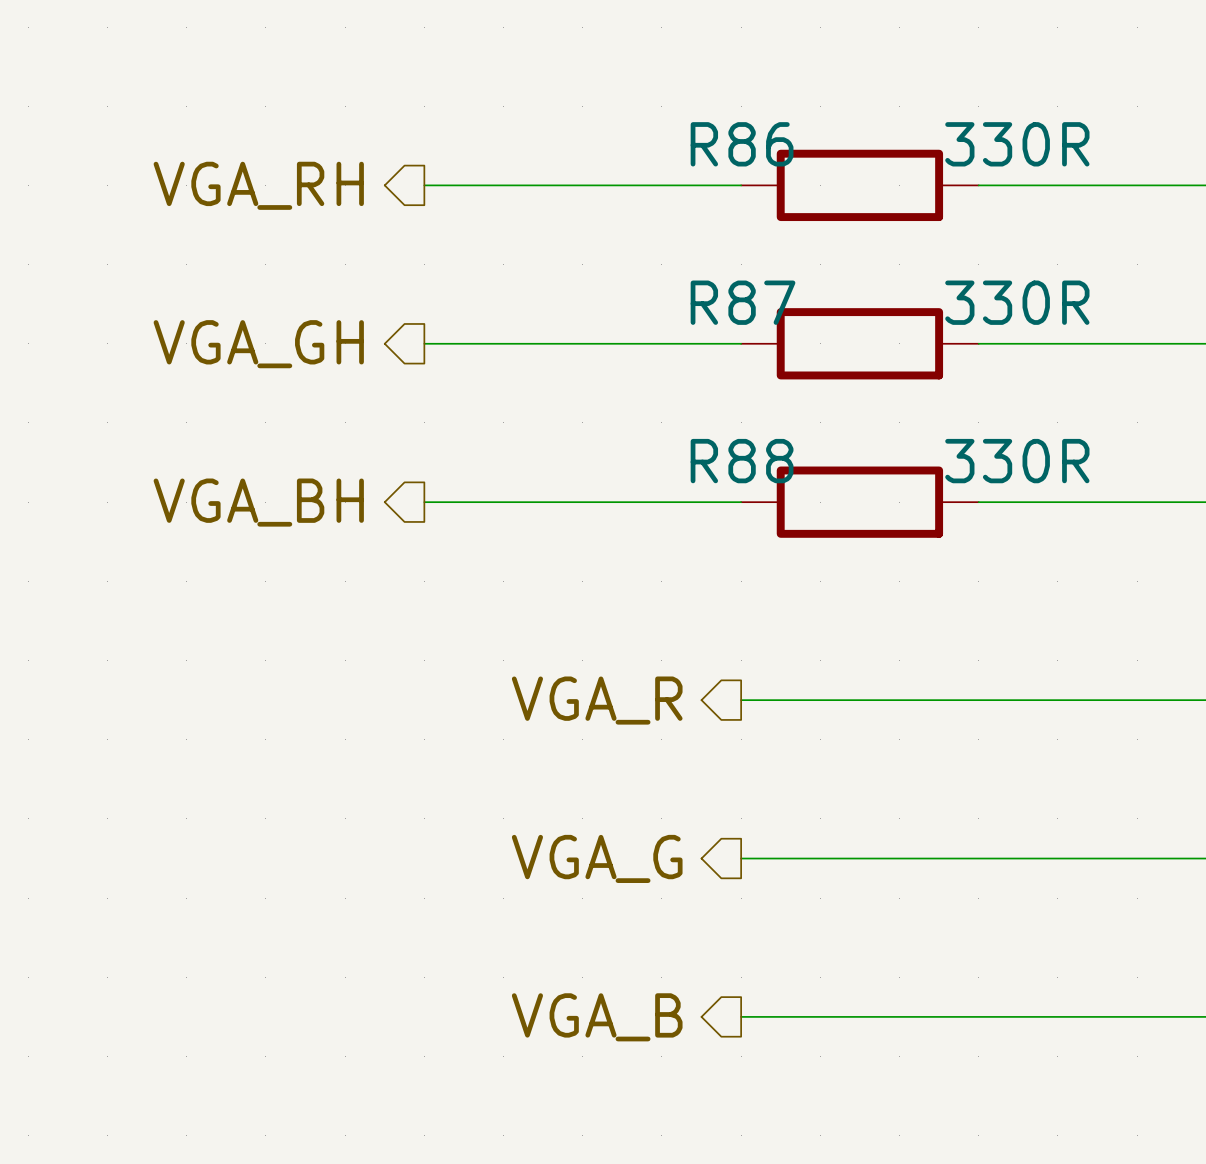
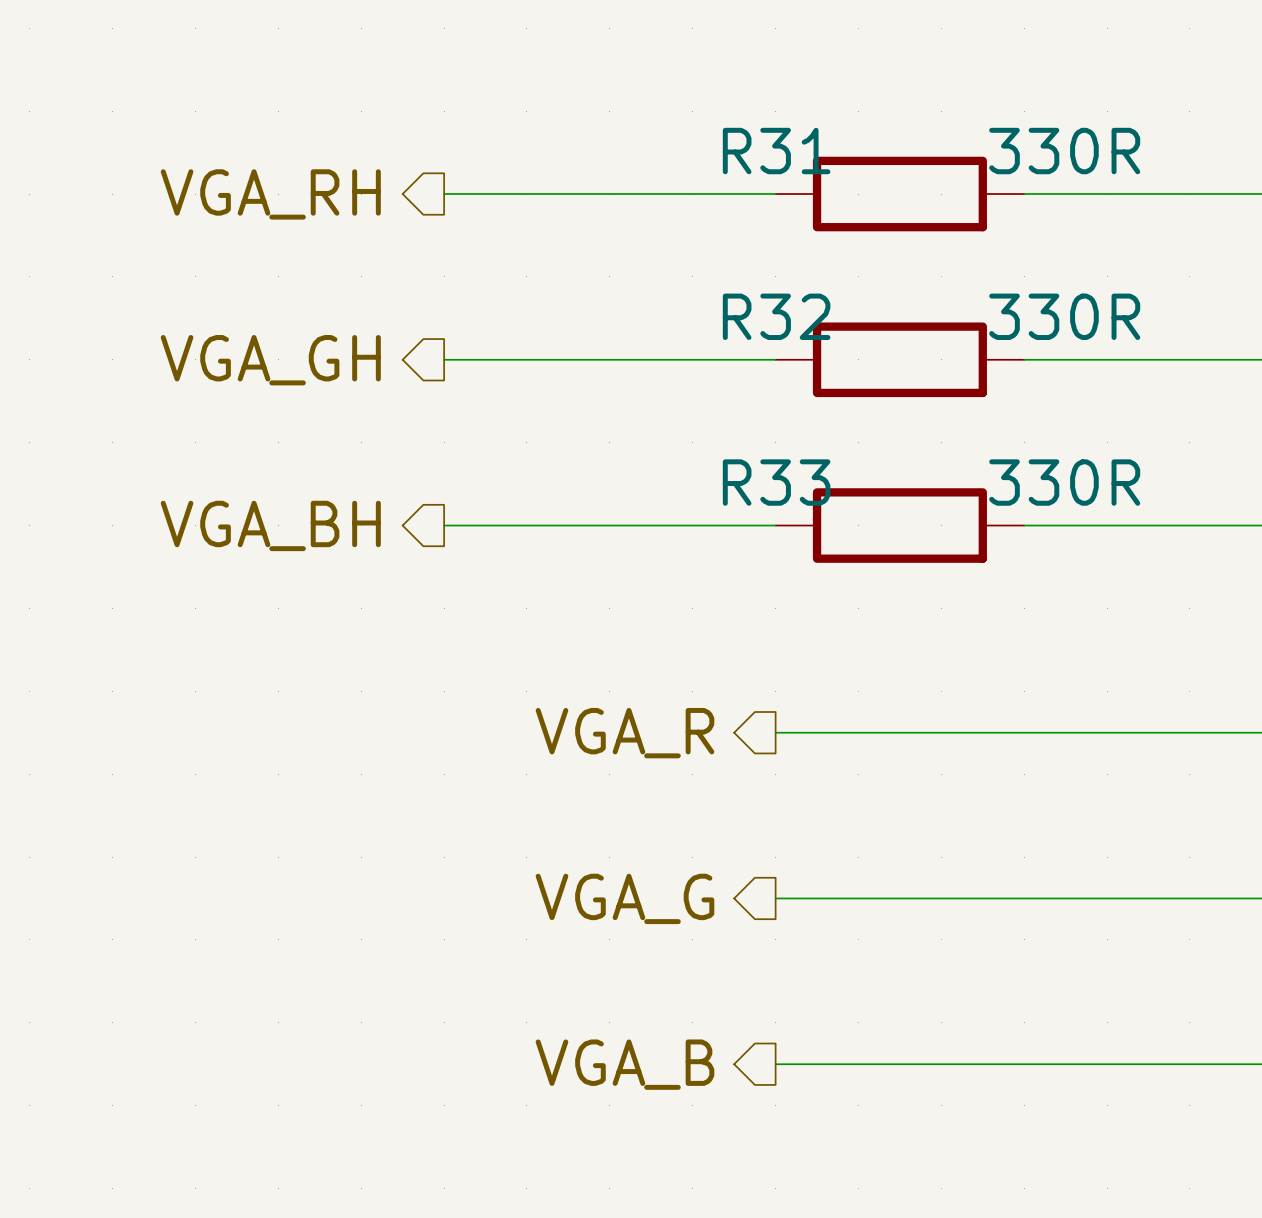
R86 name: R86 (742, 144) -> R31 (776, 151)
R87 name: R87 (743, 302) -> R32 (776, 316)
R88 name: R88 (742, 461) -> R33 (776, 482)

